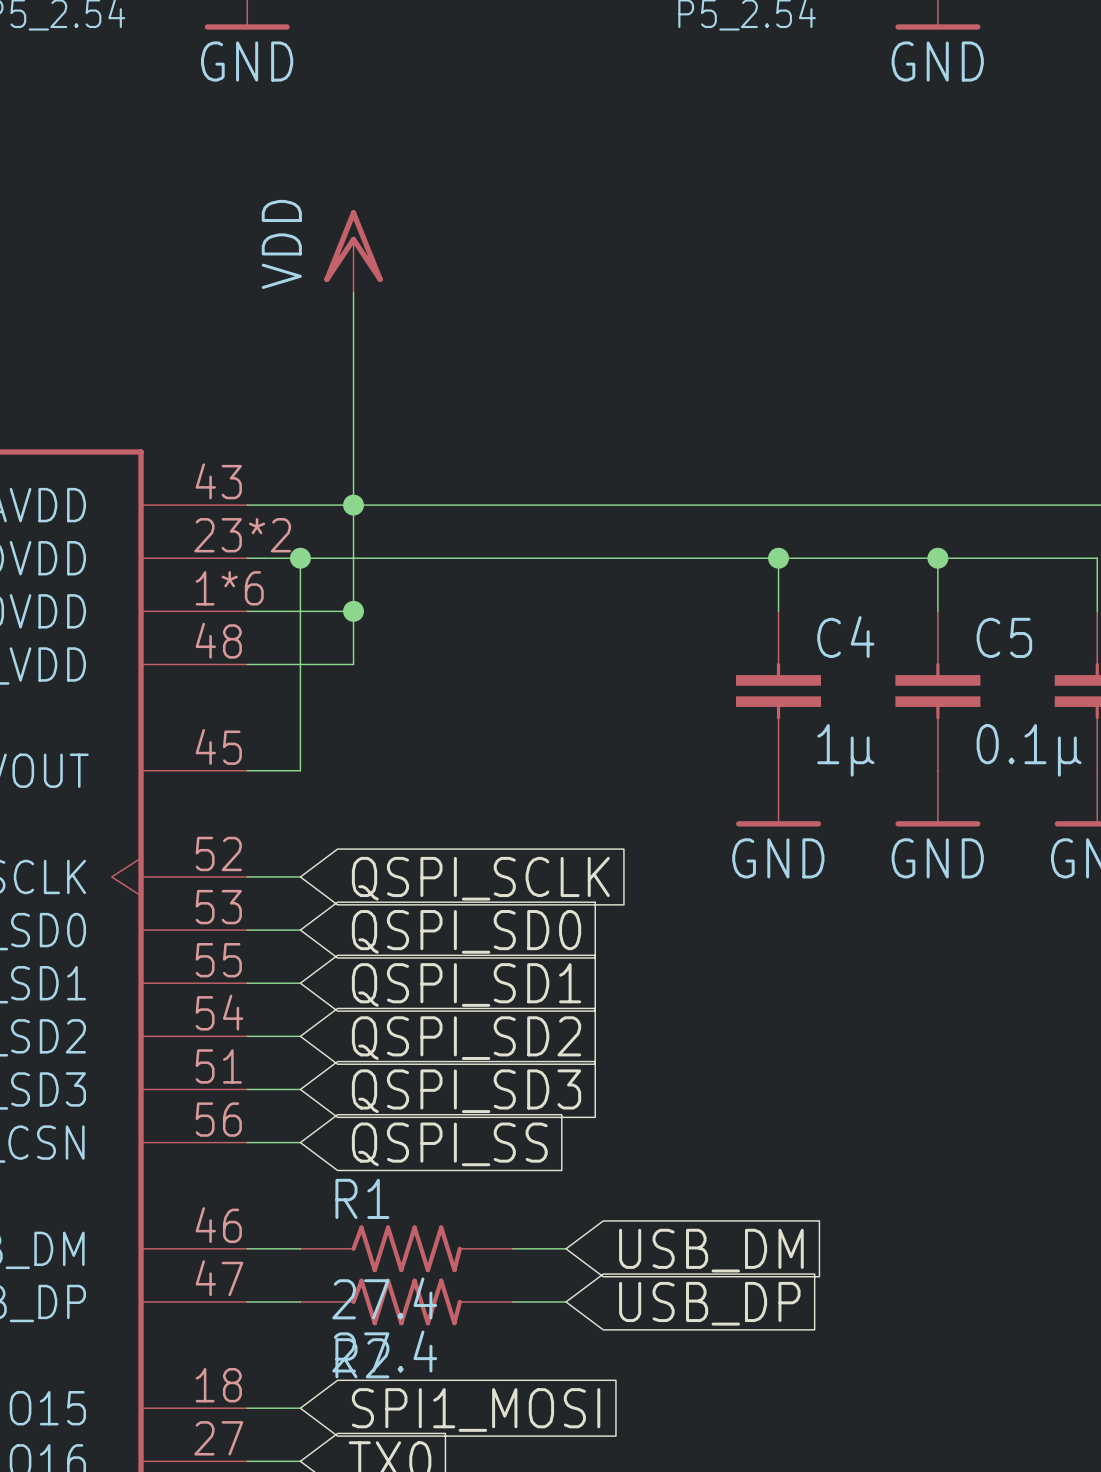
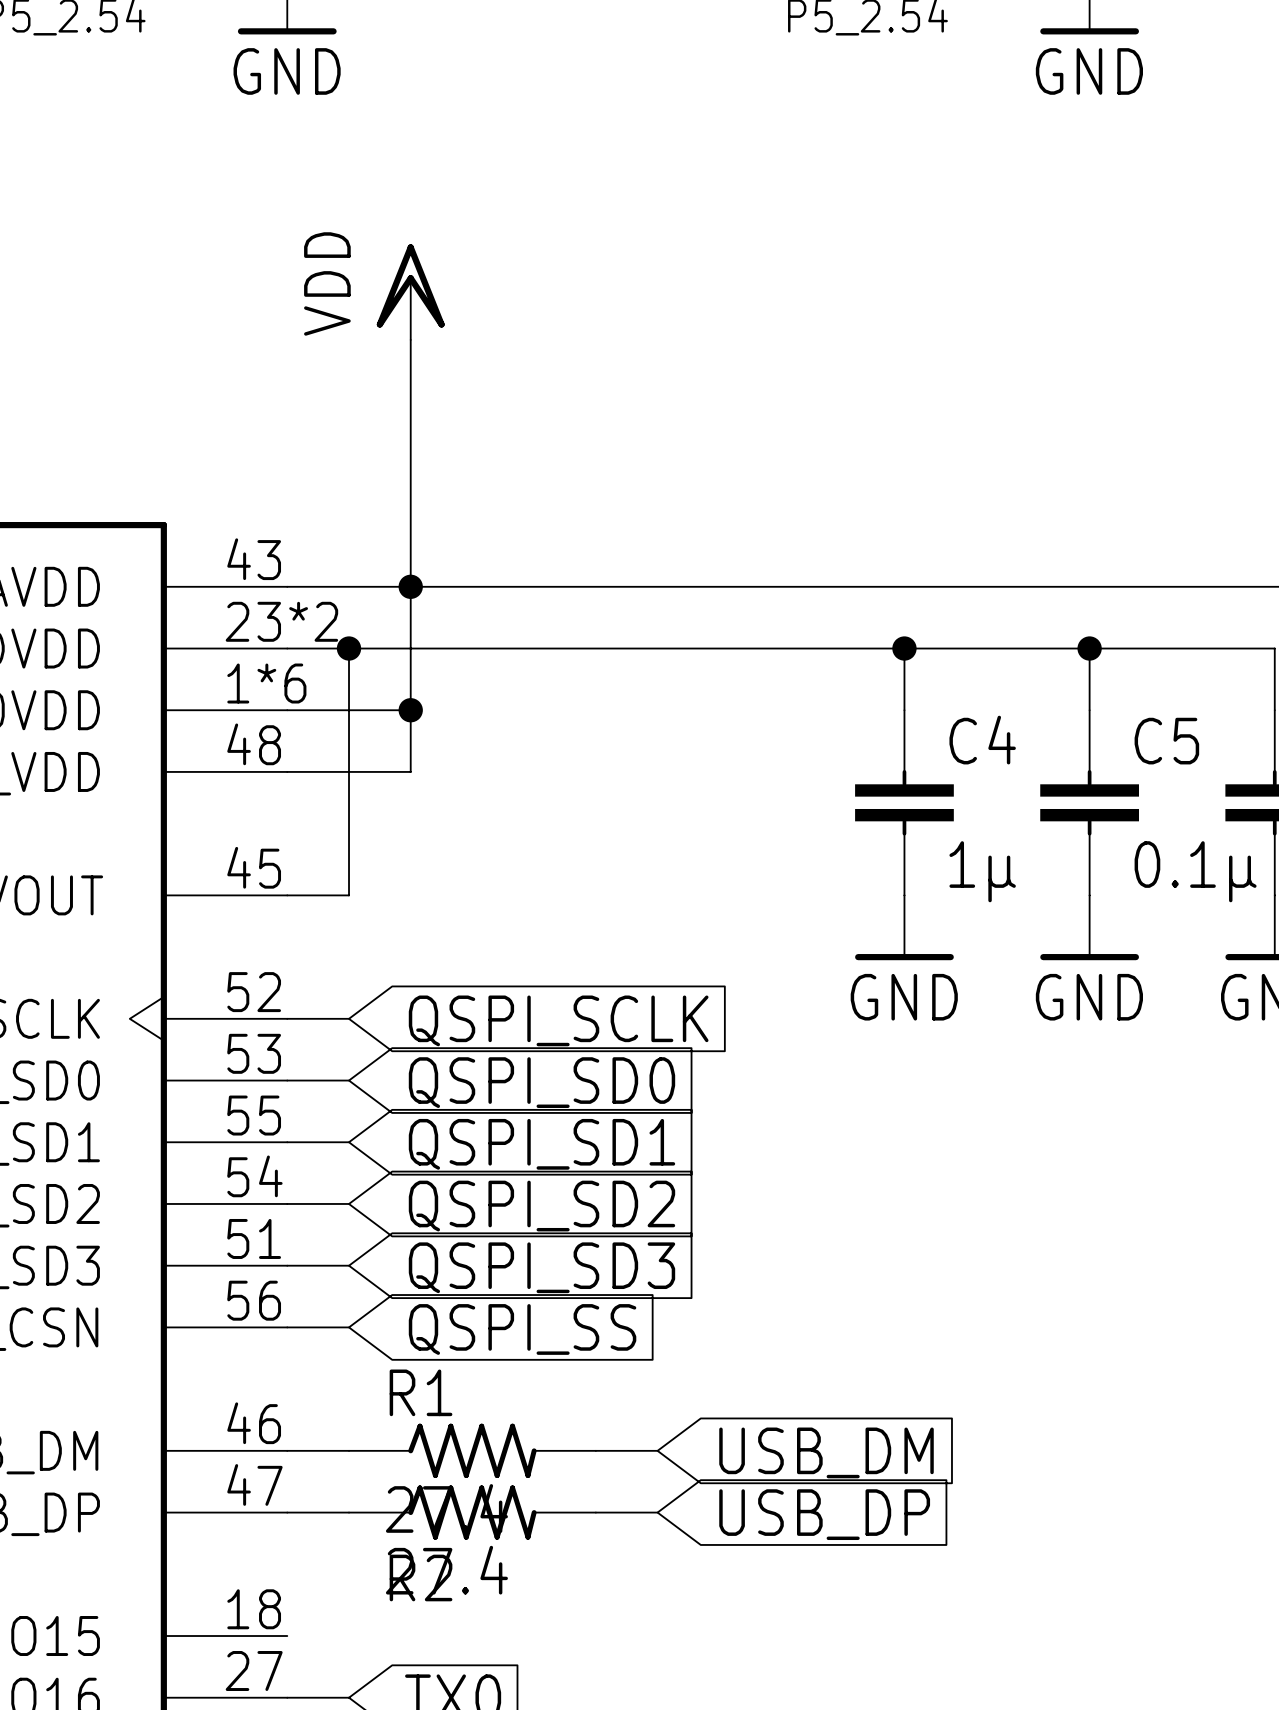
wire: (247, 1408) (300, 1408) -> none
global label: SPI1_MOSI (476, 1409) -> none

